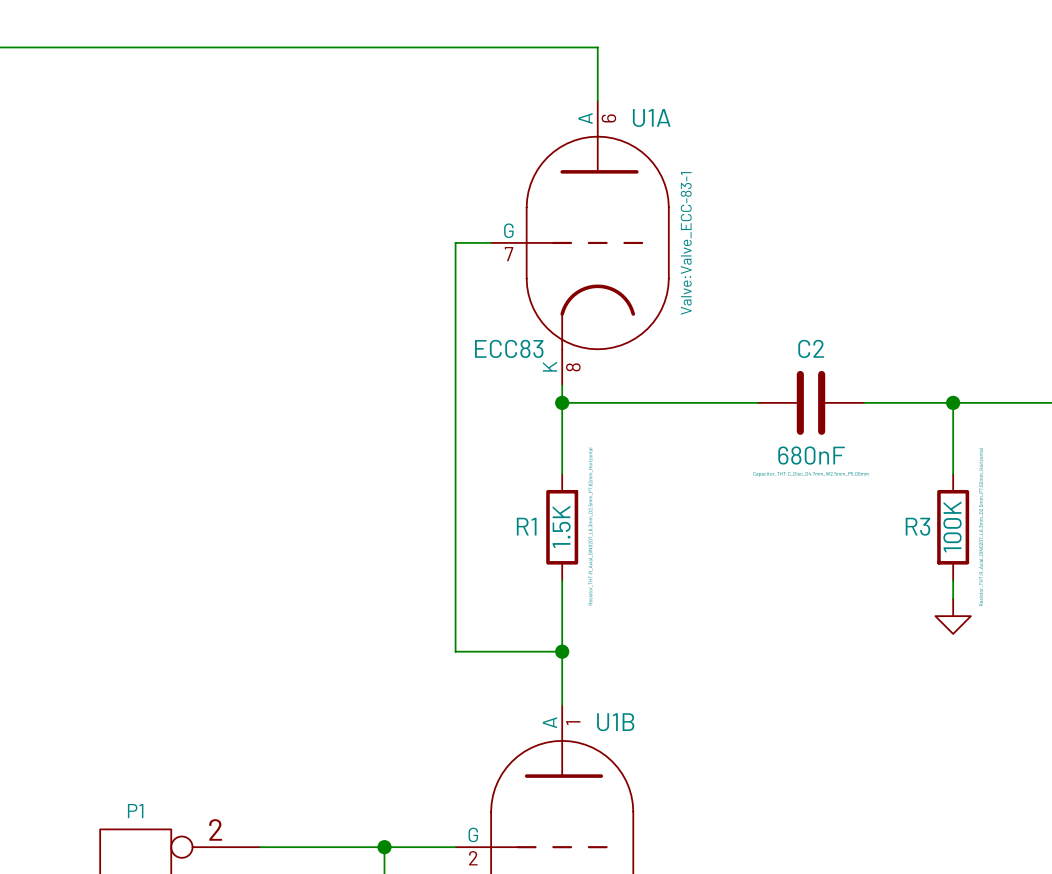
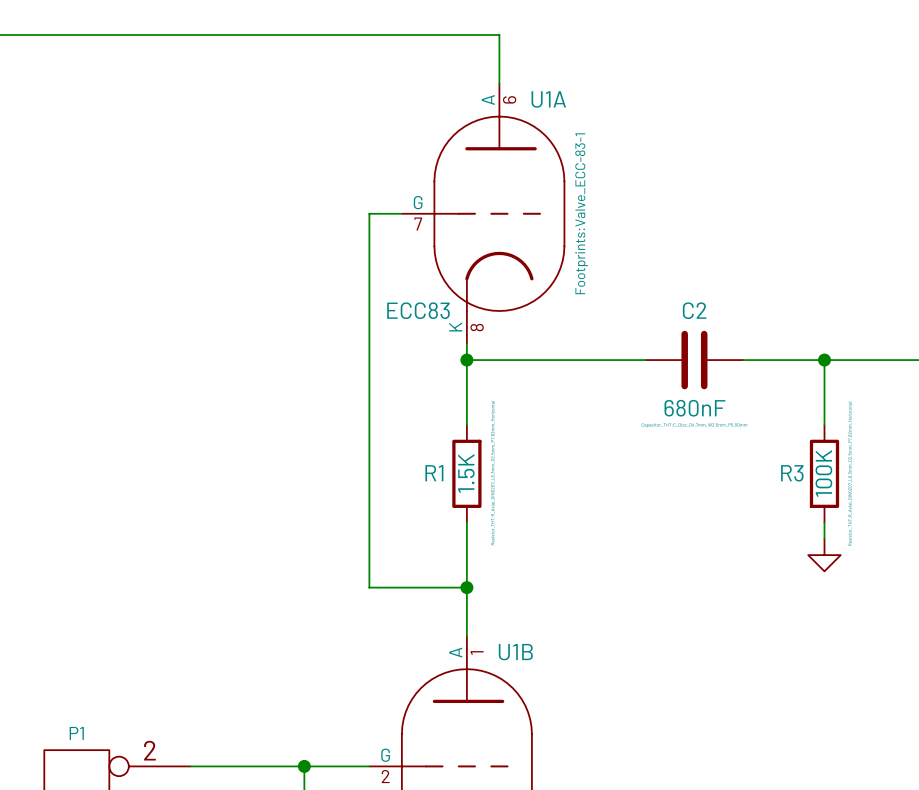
U1A text: Valve:Valve_ECC-83-1 (686, 243) -> Footprints:Valve_ECC-83-1 (581, 213)

